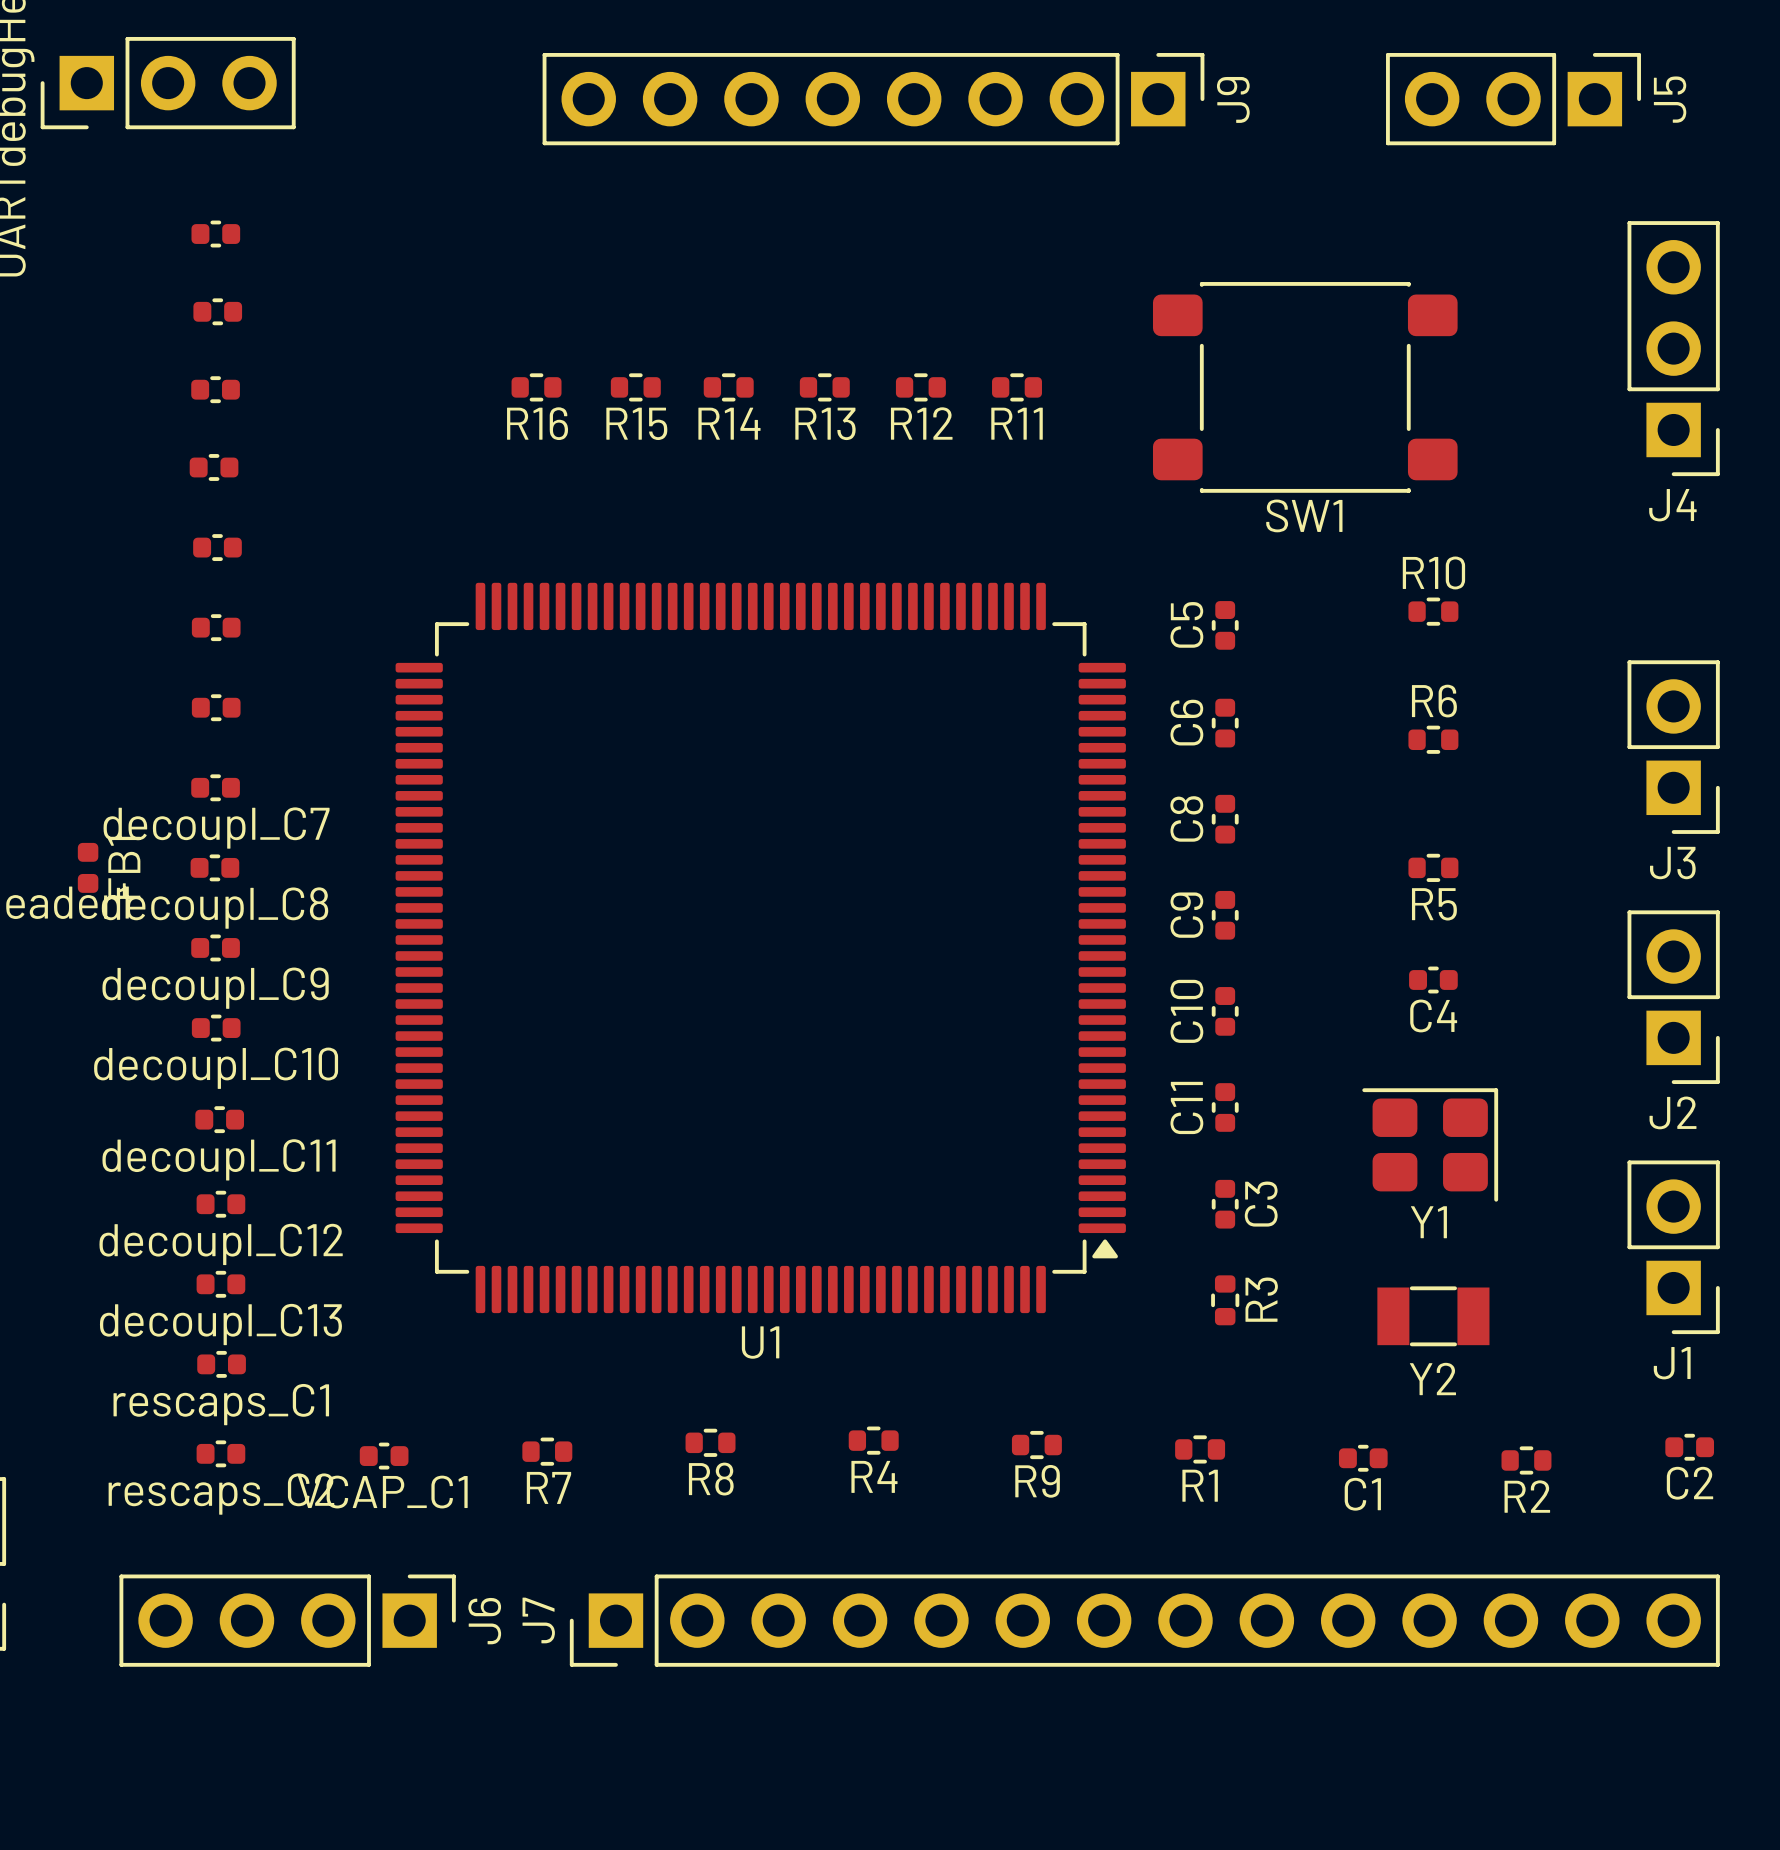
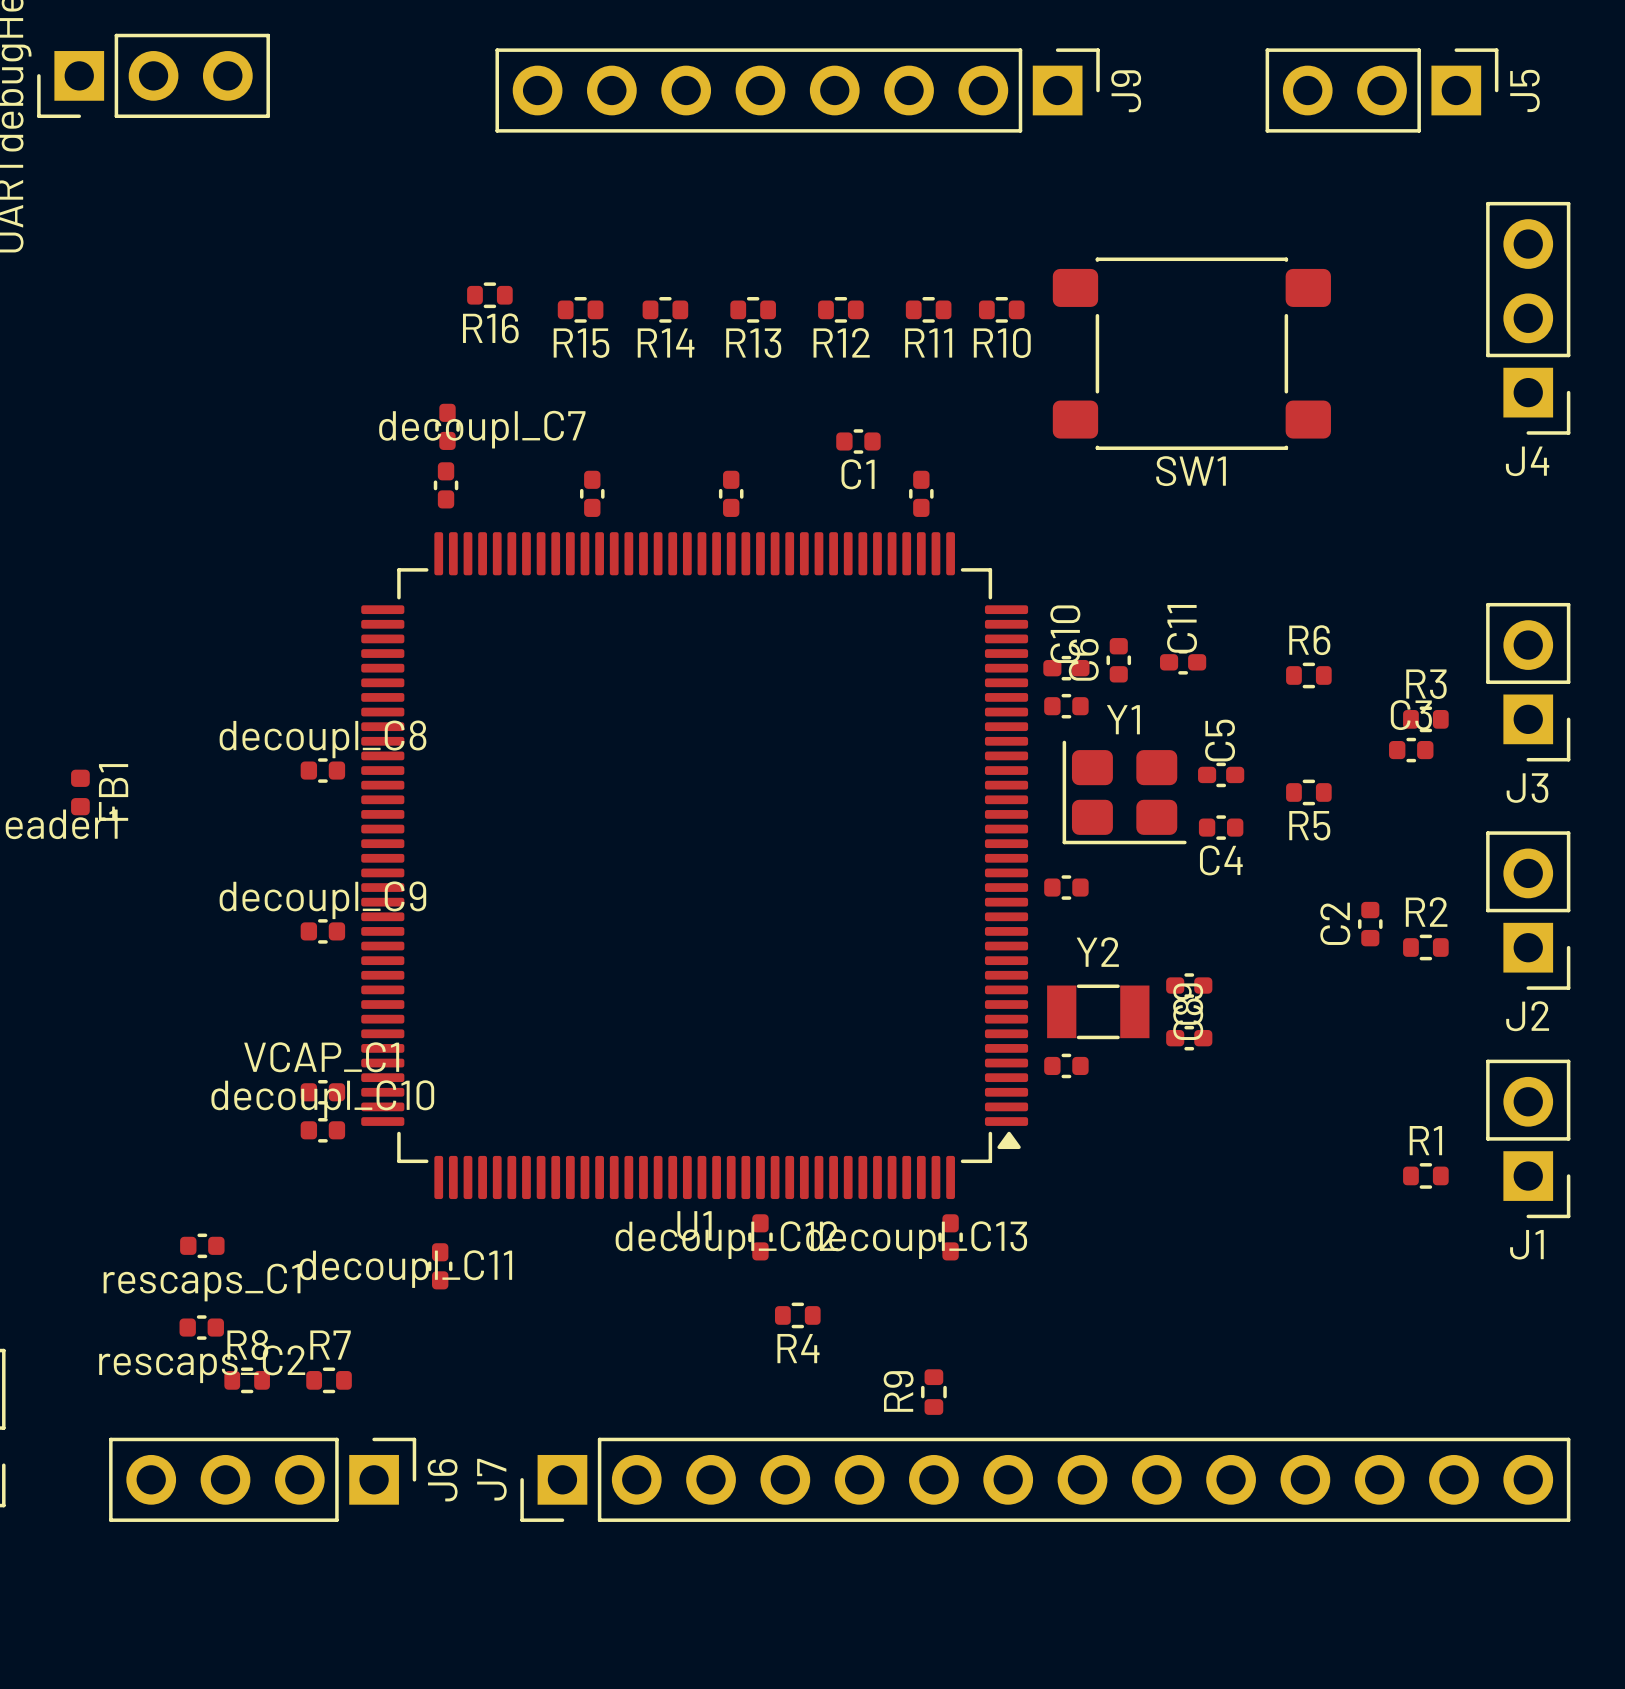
part: (215, 234) -> none
part: (217, 311) -> none
R16 position: (536, 387) -> (489, 295)
R15 position: (635, 387) -> (580, 309)
R14 position: (728, 387) -> (665, 309)
R13 position: (824, 387) -> (753, 309)
R12 position: (920, 387) -> (840, 309)
R11 position: (1017, 387) -> (928, 309)
part: (215, 389) -> none
part: (214, 467) -> none
part: none -> (446, 485)
part: none -> (592, 493)
part: none -> (731, 493)
part: none -> (921, 493)
part: (217, 547) -> none
R10 name position: R10 (1433, 572) -> R10 (1002, 343)
C5 footprint: [1211, 601, 1239, 650] -> [1198, 762, 1245, 788]
R10 position: (1433, 611) -> (1001, 309)
part: (216, 627) -> none
part: (216, 707) -> none
part: none -> (1066, 706)
decoupl_C7 footprint: [191, 774, 240, 802] -> [435, 403, 460, 450]
C8 footprint: [1211, 794, 1239, 844] -> [1166, 973, 1213, 998]
decoupl_C8 position: (214, 867) -> (322, 770)
C9 footprint: [1211, 890, 1239, 940] -> [1166, 1025, 1213, 1051]
decoupl_C8 name position: decoupl_C8 (215, 908) -> decoupl_C8 (322, 739)
decoupl_C9 position: (215, 947) -> (322, 931)
part: none -> (1066, 887)
C4 position: (1433, 979) -> (1221, 827)
C10 footprint: [1211, 987, 1239, 1036] -> [1043, 655, 1090, 681]
decoupl_C9 name position: decoupl_C9 (215, 988) -> decoupl_C9 (322, 900)
decoupl_C10 position: (216, 1028) -> (322, 1130)
decoupl_C10 name position: decoupl_C10 (216, 1068) -> decoupl_C10 (322, 1099)
C11 footprint: [1211, 1083, 1239, 1132] -> [1160, 650, 1207, 675]
decoupl_C11 footprint: [195, 1106, 245, 1134] -> [427, 1243, 453, 1290]
Y1 rotation: 0° (1430, 1144) -> 180° (1124, 792)
Y1 position: (1430, 1144) -> (1124, 792)
part: none -> (1066, 1065)
decoupl_C12 footprint: [196, 1190, 246, 1218] -> [748, 1214, 773, 1261]
C3 rotation: 0° (1225, 1204) -> 90° clockwise (1411, 750)
C3 position: (1225, 1204) -> (1411, 750)
decoupl_C13 footprint: [196, 1270, 246, 1298] -> [938, 1214, 963, 1261]
R3 rotation: 0° (1225, 1300) -> 90° clockwise (1425, 719)
R3 position: (1225, 1300) -> (1425, 719)
Y2 position: (1433, 1316) -> (1098, 1011)
Y2 name position: Y2 (1432, 1379) -> Y2 (1097, 952)
R8 position: (710, 1442) -> (247, 1380)
R9 rotation: 0° (1036, 1445) -> 90° clockwise (933, 1392)
R9 position: (1036, 1445) -> (933, 1392)
C2 rotation: 0° (1689, 1447) -> 90° clockwise (1370, 924)
C2 position: (1689, 1447) -> (1370, 924)
R1 position: (1200, 1449) -> (1425, 1175)
R7 position: (547, 1451) -> (329, 1380)
VCAP_C1 position: (384, 1456) -> (322, 1092)
C1 position: (1363, 1458) -> (858, 441)
R2 position: (1526, 1460) -> (1425, 947)
R8 name position: R8 (711, 1479) -> R8 (247, 1345)
R1 name position: R1 (1200, 1485) -> R1 (1425, 1140)
R7 name position: R7 (548, 1487) -> R7 (330, 1345)
VCAP_C1 name position: VCAP_C1 (382, 1492) -> VCAP_C1 (321, 1057)
R2 name position: R2 (1527, 1496) -> R2 (1426, 912)

